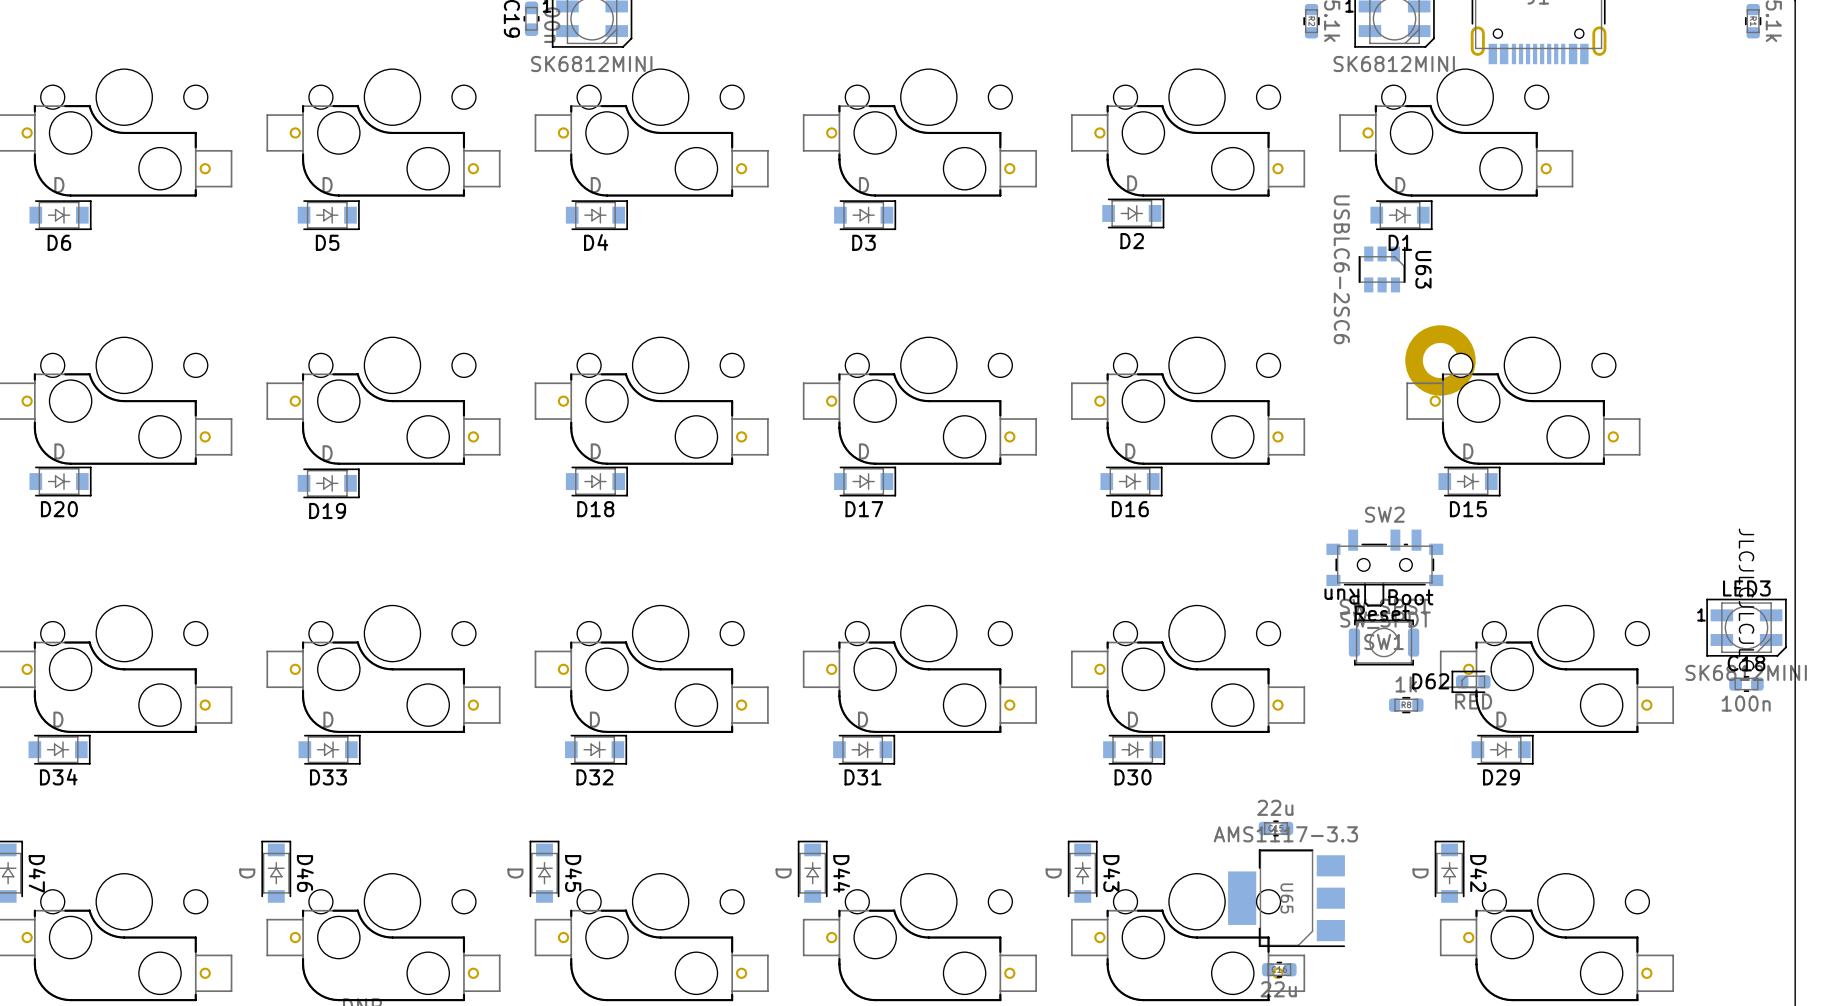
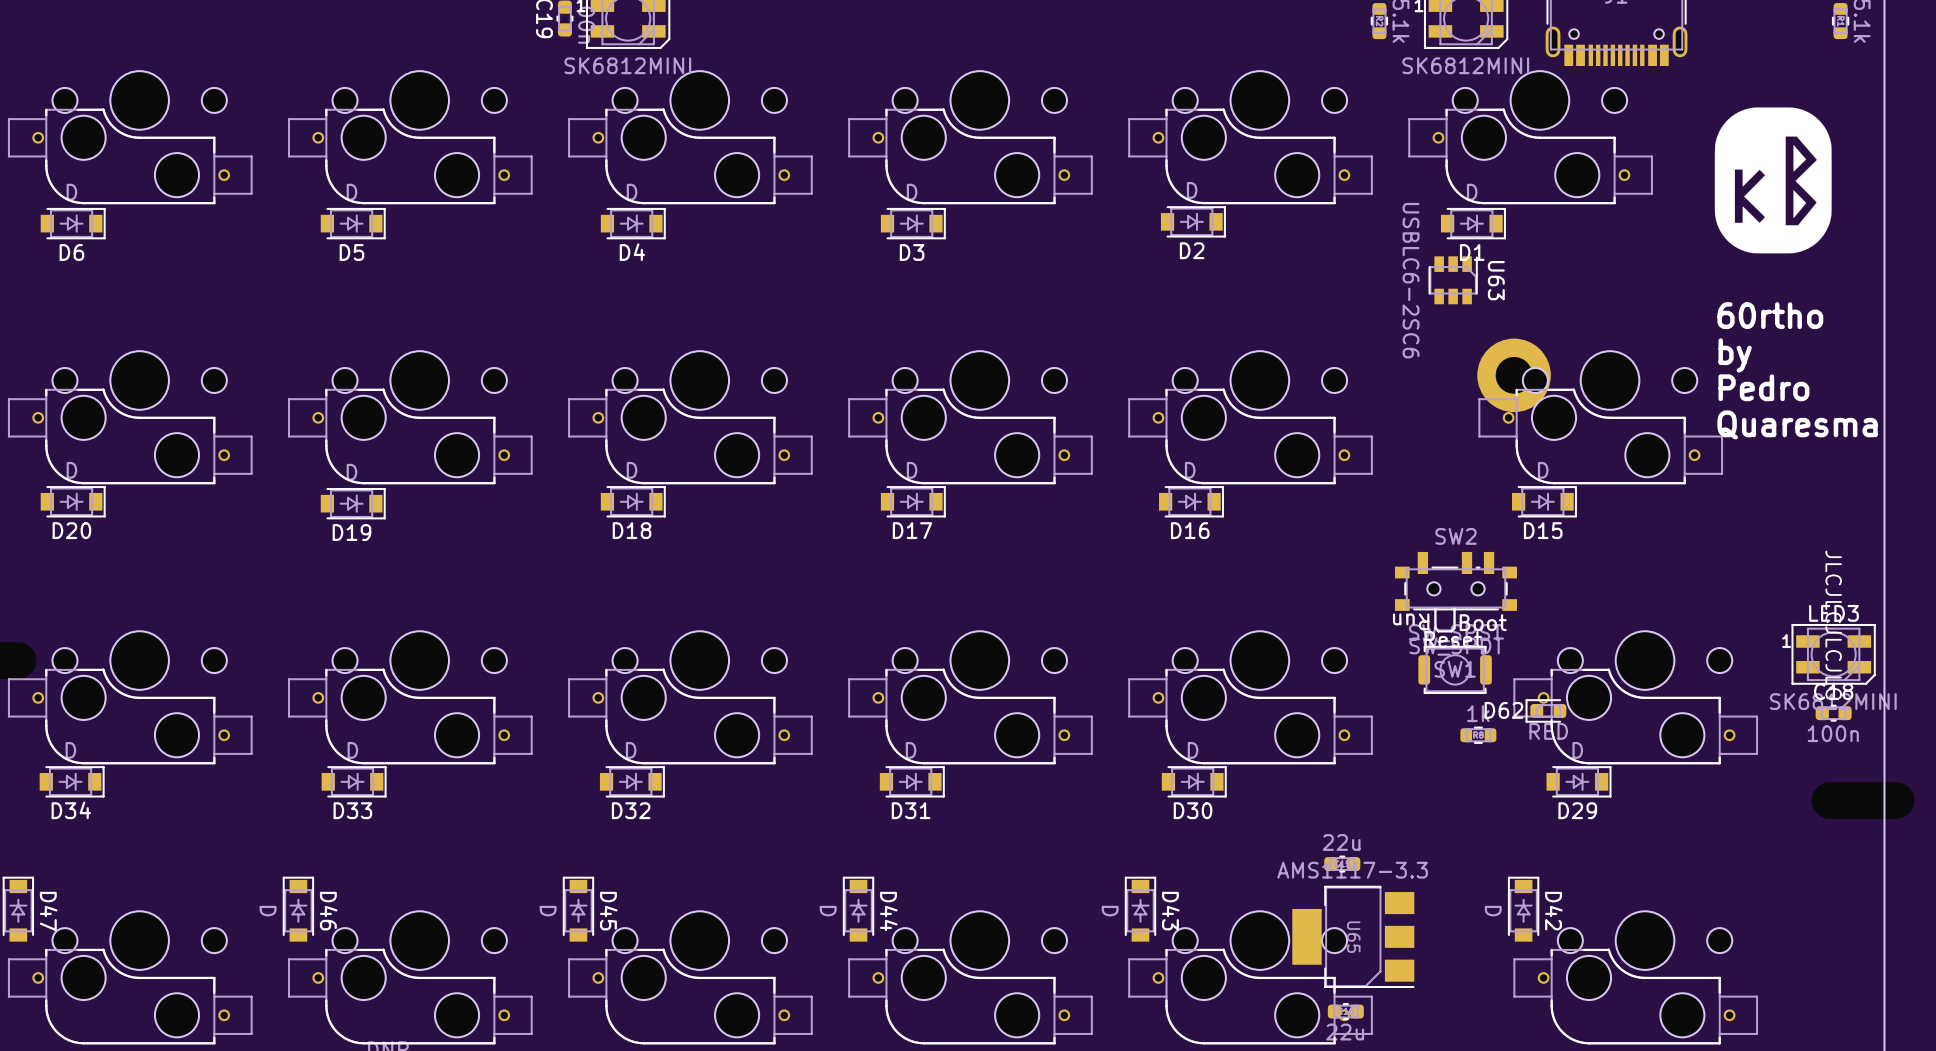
drawing: none -> [1714, 107, 1832, 254]
text: none -> 60rtho (1770, 315)
text: none -> by (1735, 355)
text: none -> Pedro (1763, 387)
text: none -> Quaresma (1797, 424)

